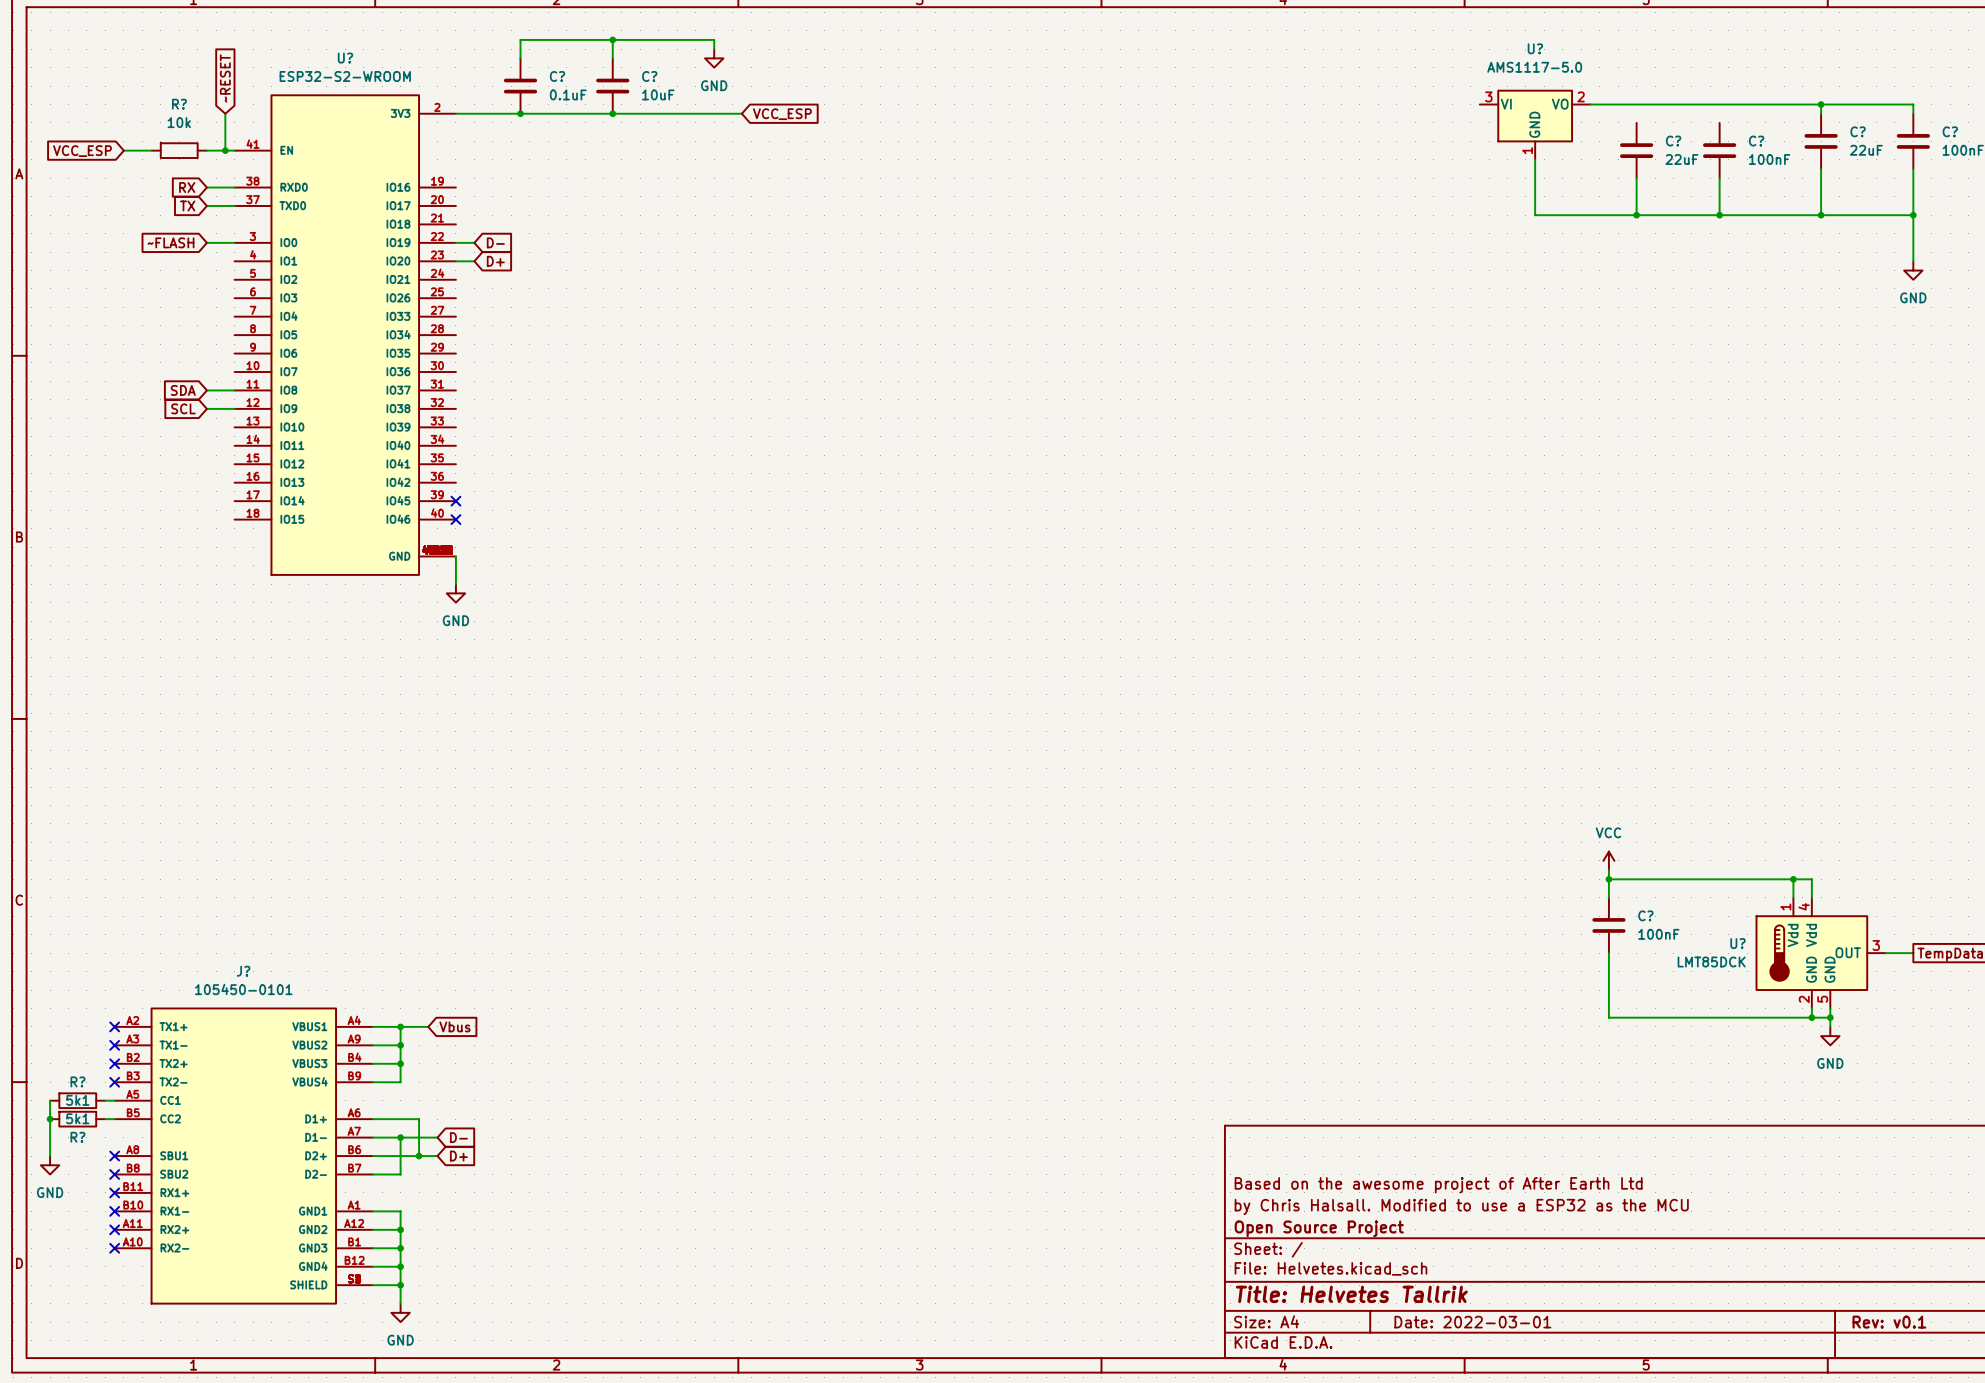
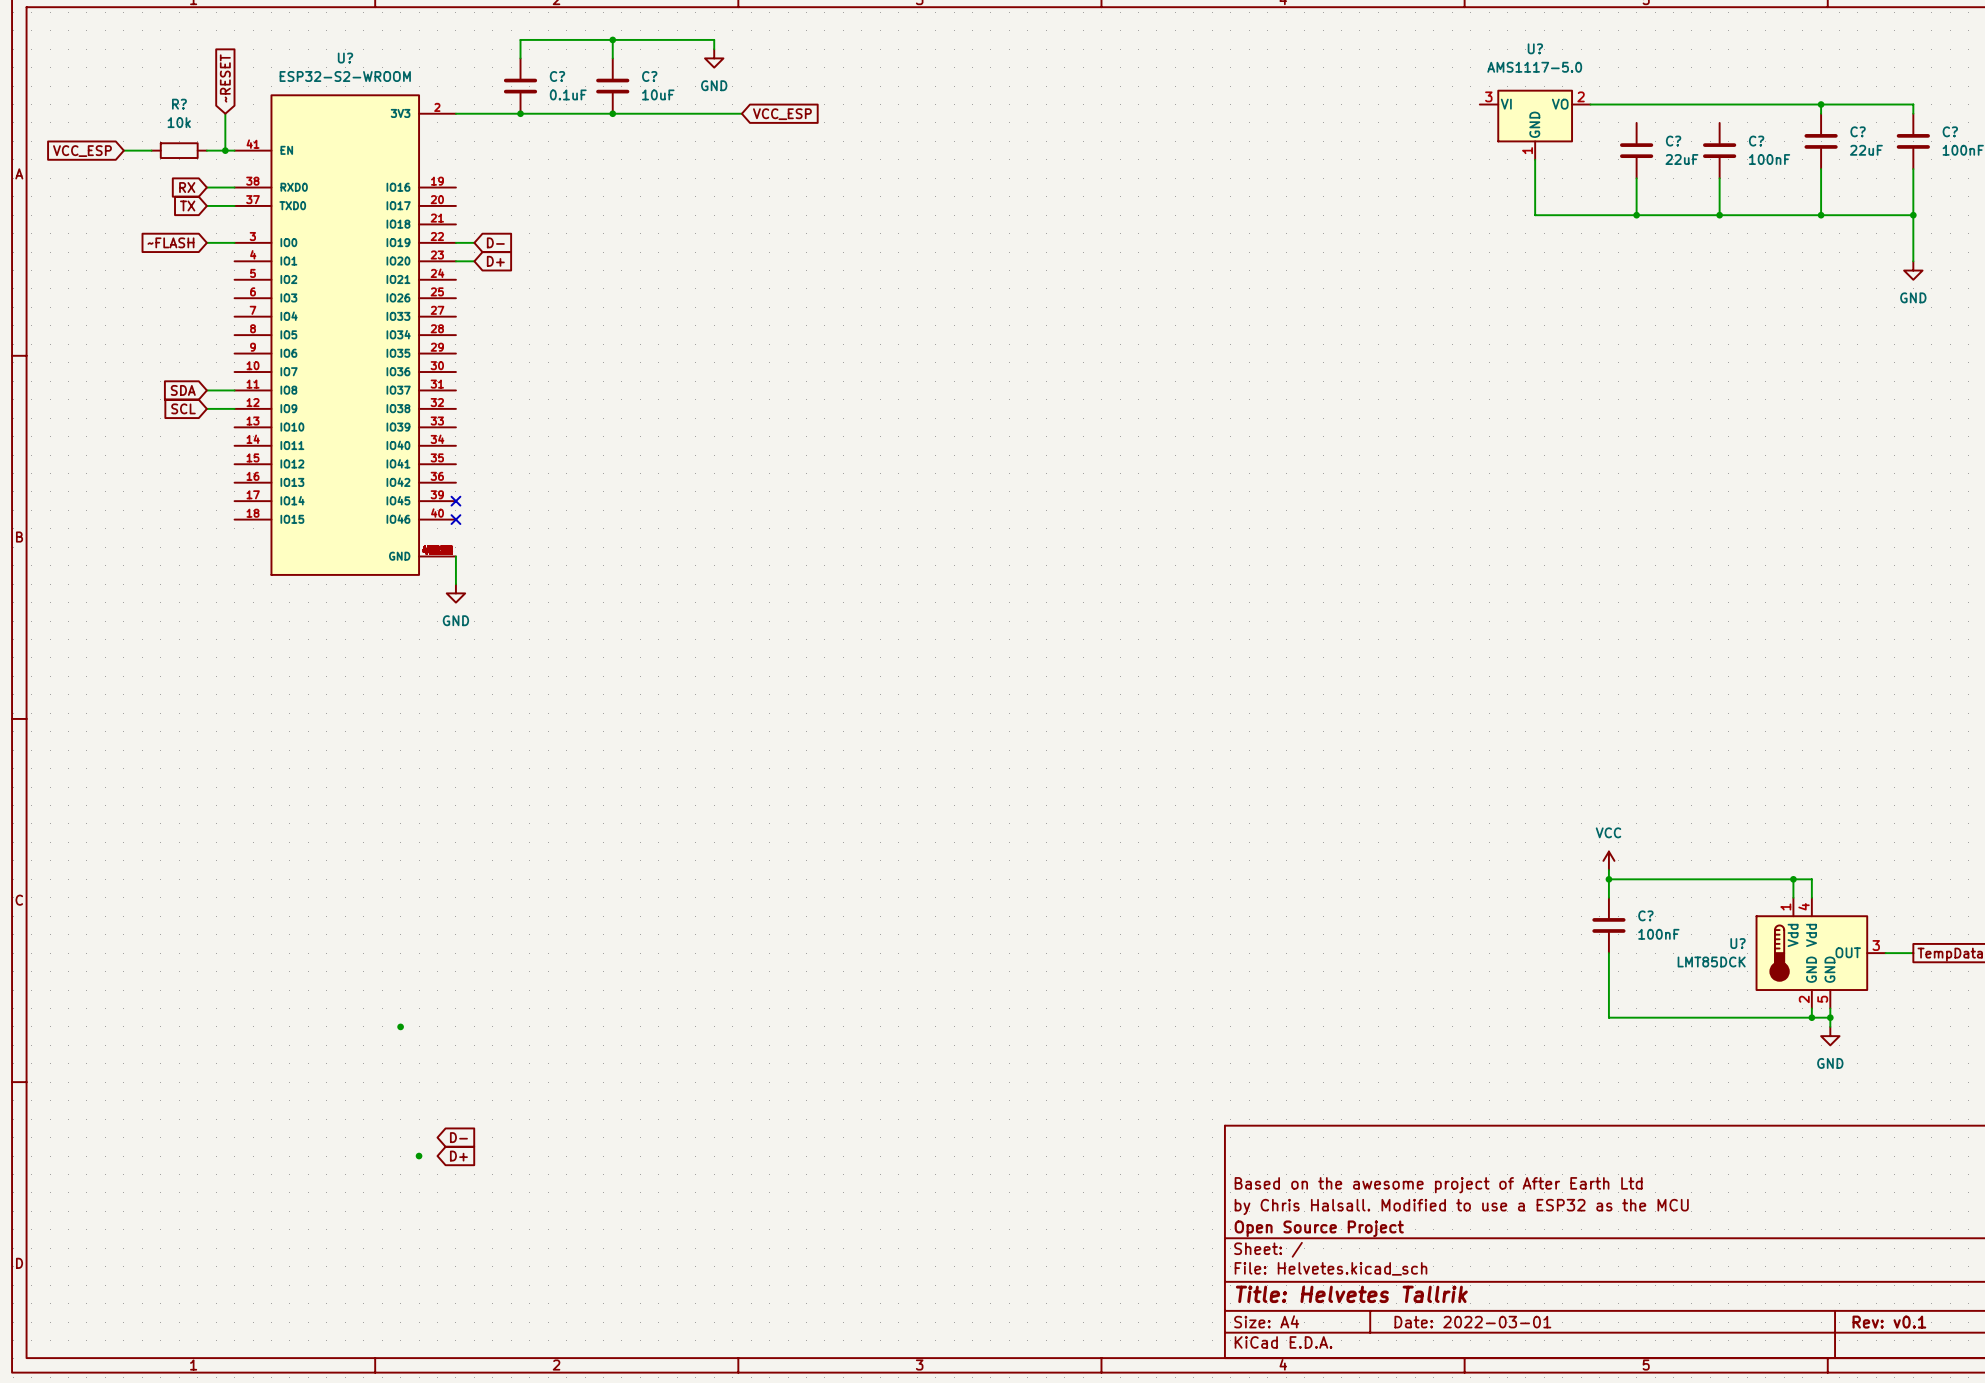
no-connect mark: (114, 1026) -> none
wire: (372, 1026) (428, 1026) -> none
wire: (400, 1026) (400, 1082) (372, 1082) -> none
global label: Vbus (454, 1026) -> none
no-connect mark: (114, 1045) -> none
wire: (372, 1045) (400, 1045) -> none
junction: (400, 1045) -> none
no-connect mark: (114, 1063) -> none
wire: (372, 1063) (400, 1063) -> none
junction: (400, 1063) -> none
no-connect mark: (114, 1082) -> none
wire: (50, 1100) (50, 1156) -> none
R?: 5k1 (77, 1100) -> none
wire: (105, 1100) (114, 1100) -> none
junction: (50, 1119) -> none
R?: 5k1 (77, 1119) -> none
wire: (105, 1119) (114, 1119) -> none
wire: (372, 1119) (419, 1119) (419, 1156) -> none
wire: (372, 1137) (437, 1137) -> none
wire: (400, 1137) (400, 1174) (372, 1174) -> none
junction: (400, 1137) -> none
no-connect mark: (114, 1156) -> none
J?: 105450-0101 (243, 1156) -> none
wire: (372, 1156) (437, 1156) -> none
power symbol: GND (50, 1165) -> none
no-connect mark: (114, 1174) -> none
no-connect mark: (114, 1192) -> none
no-connect mark: (114, 1211) -> none
wire: (372, 1211) (400, 1211) (400, 1303) -> none
no-connect mark: (114, 1229) -> none
wire: (372, 1229) (400, 1229) -> none
junction: (400, 1229) -> none
no-connect mark: (114, 1248) -> none
wire: (372, 1248) (400, 1248) -> none
junction: (400, 1248) -> none
wire: (372, 1266) (400, 1266) -> none
junction: (400, 1266) -> none
wire: (372, 1285) (400, 1285) -> none
junction: (400, 1285) -> none
power symbol: GND (400, 1312) -> none

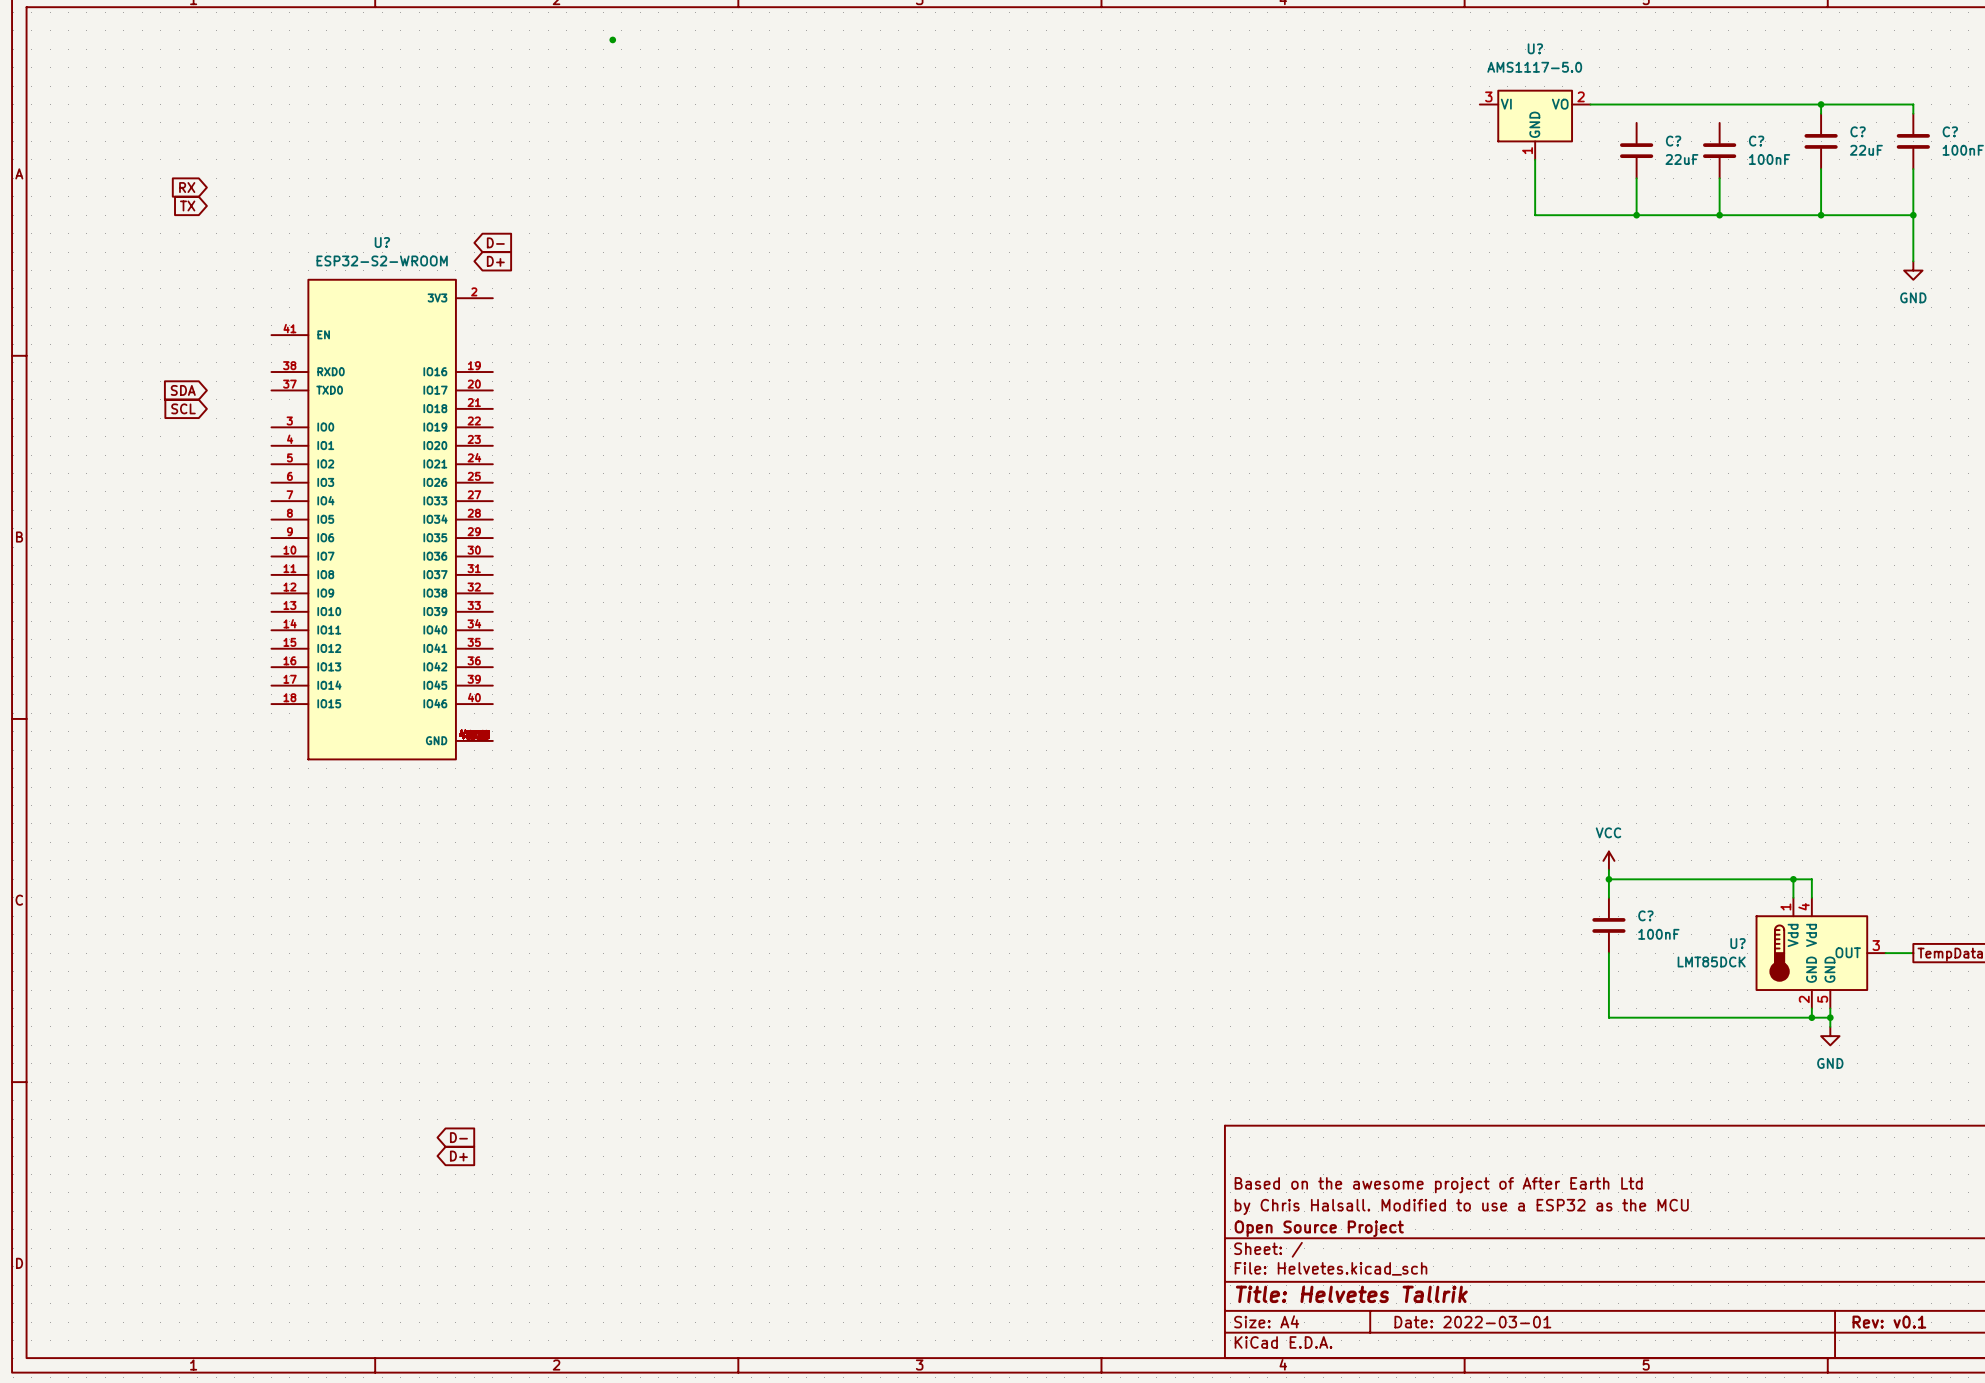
wire: (612, 39) (612, 58) -> none
wire: (714, 49) (714, 39) (520, 39) (520, 58) -> none
power symbol: GND (714, 58) -> none
global label: ~RESET (225, 78) -> none
C?: 0.1uF (520, 86) -> none
C?: 10uF (612, 86) -> none
wire: (225, 113) (225, 150) -> none
wire: (455, 113) (741, 113) -> none
junction: (520, 113) -> none
junction: (612, 113) -> none
global label: VCC_ESP (782, 114) -> none
wire: (123, 150) (151, 150) -> none
R?: 10k (179, 150) -> none
wire: (206, 150) (234, 150) -> none
junction: (225, 150) -> none
global label: VCC_ESP (82, 151) -> none
wire: (206, 187) (234, 187) -> none
wire: (206, 205) (234, 205) -> none
global label: ~FLASH (170, 242) -> none
wire: (206, 242) (234, 242) -> none
wire: (455, 242) (474, 242) -> none
wire: (455, 261) (474, 261) -> none
U?: ESP32-S2-WROOM (345, 335) -> none
wire: (206, 390) (234, 390) -> none
wire: (206, 408) (234, 408) -> none
no-connect mark: (455, 501) -> none
U?: none -> ESP32-S2-WROOM (382, 519)
no-connect mark: (455, 519) -> none
power symbol: GND (455, 593) -> none
junction: (400, 1026) -> none
junction: (419, 1156) -> none

